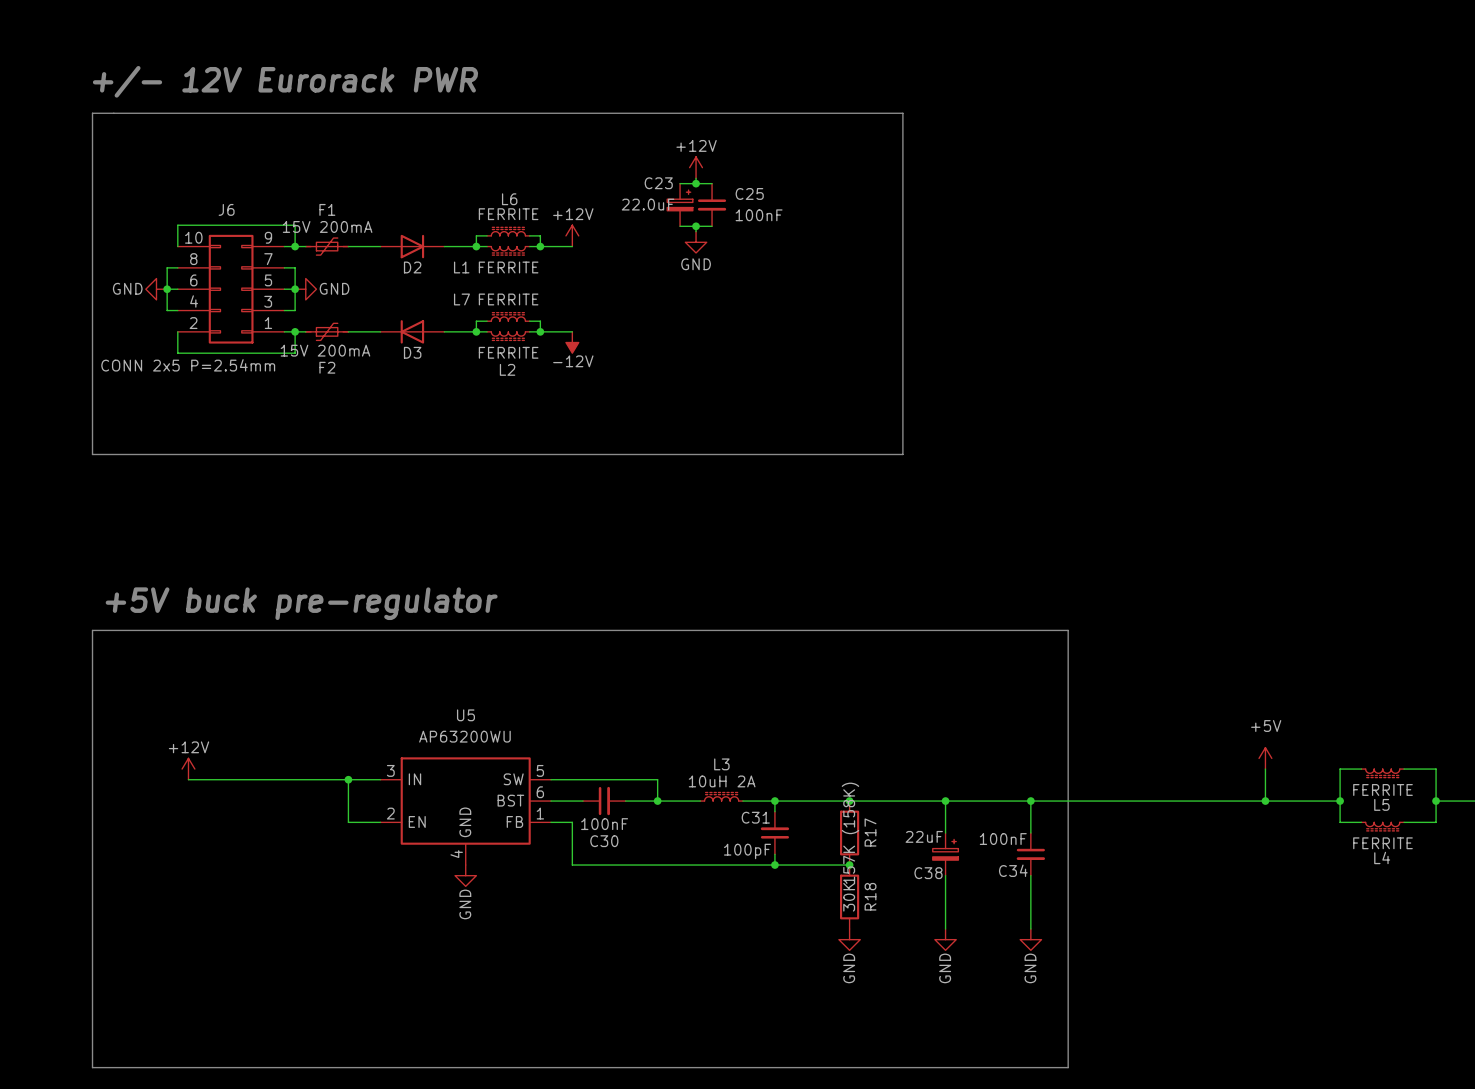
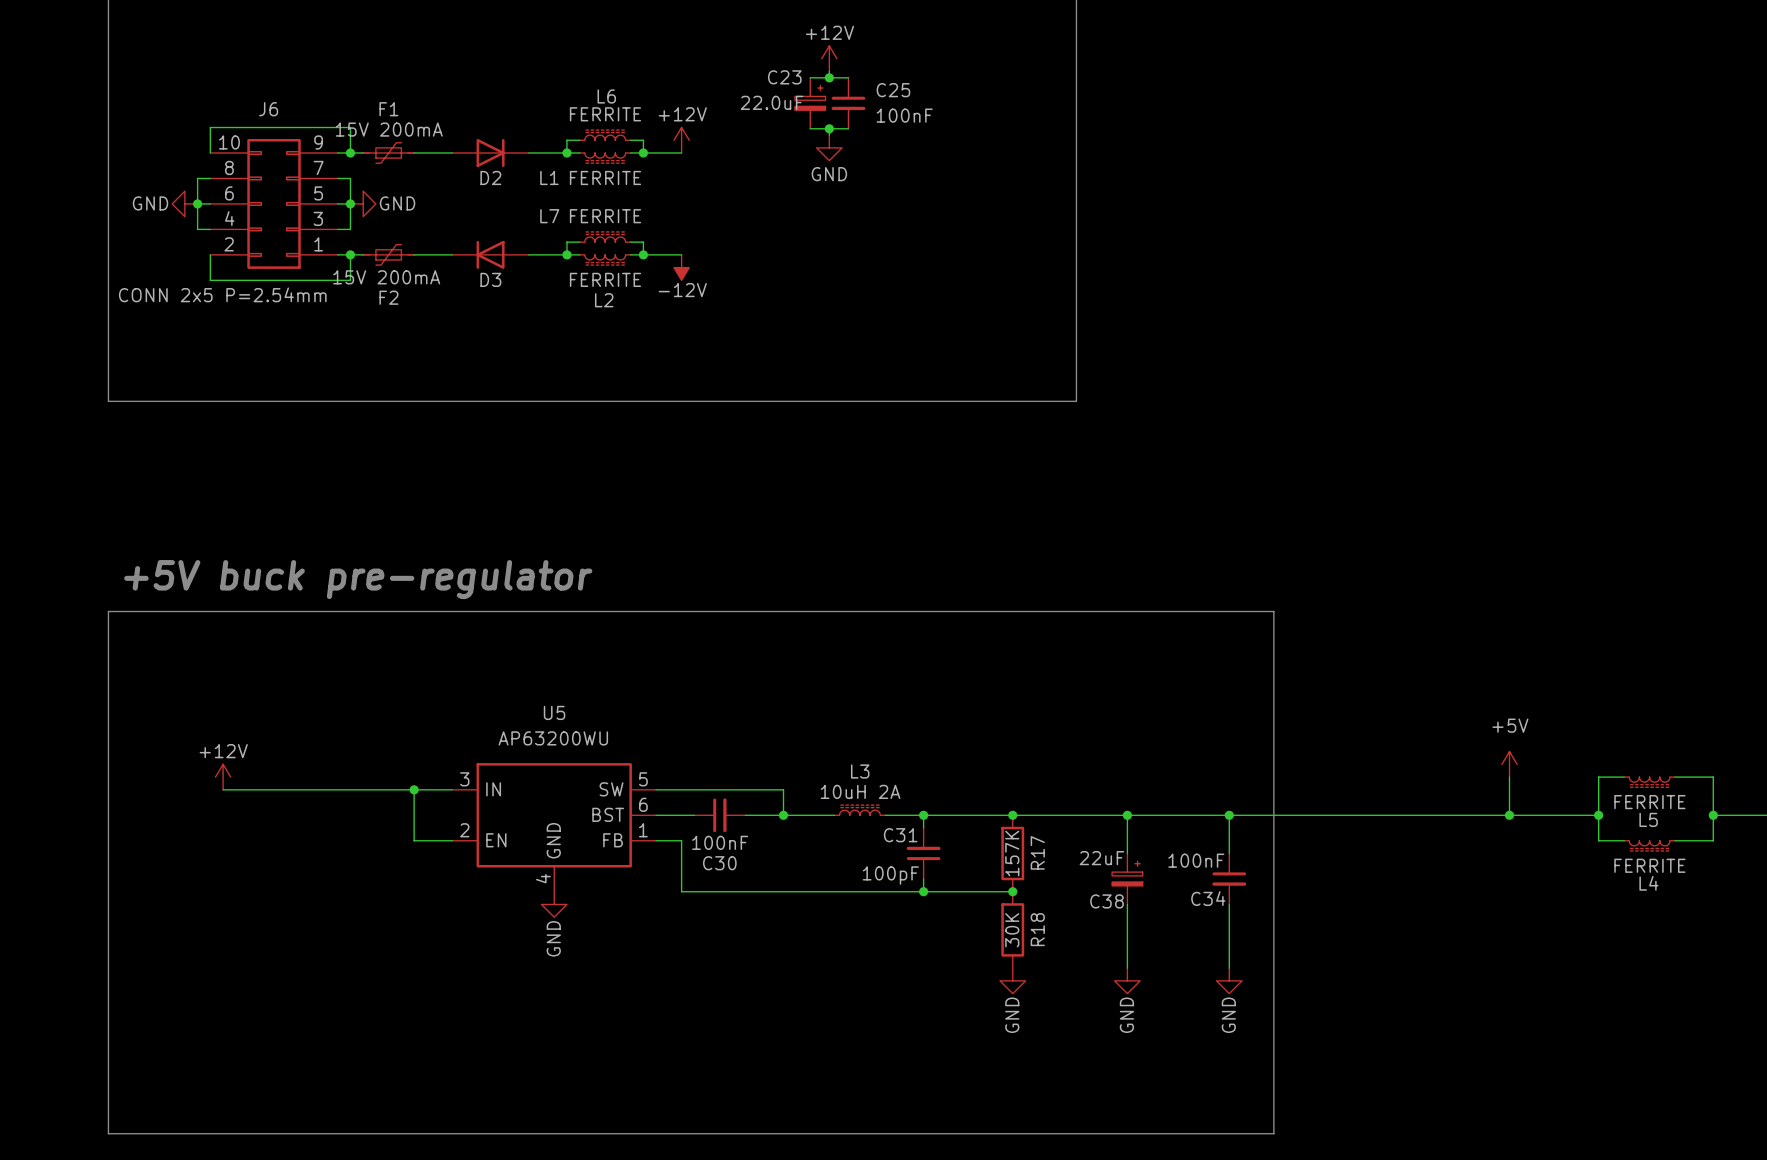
R17 value: 157K (158K) (850, 833) -> 157K (1012, 853)

